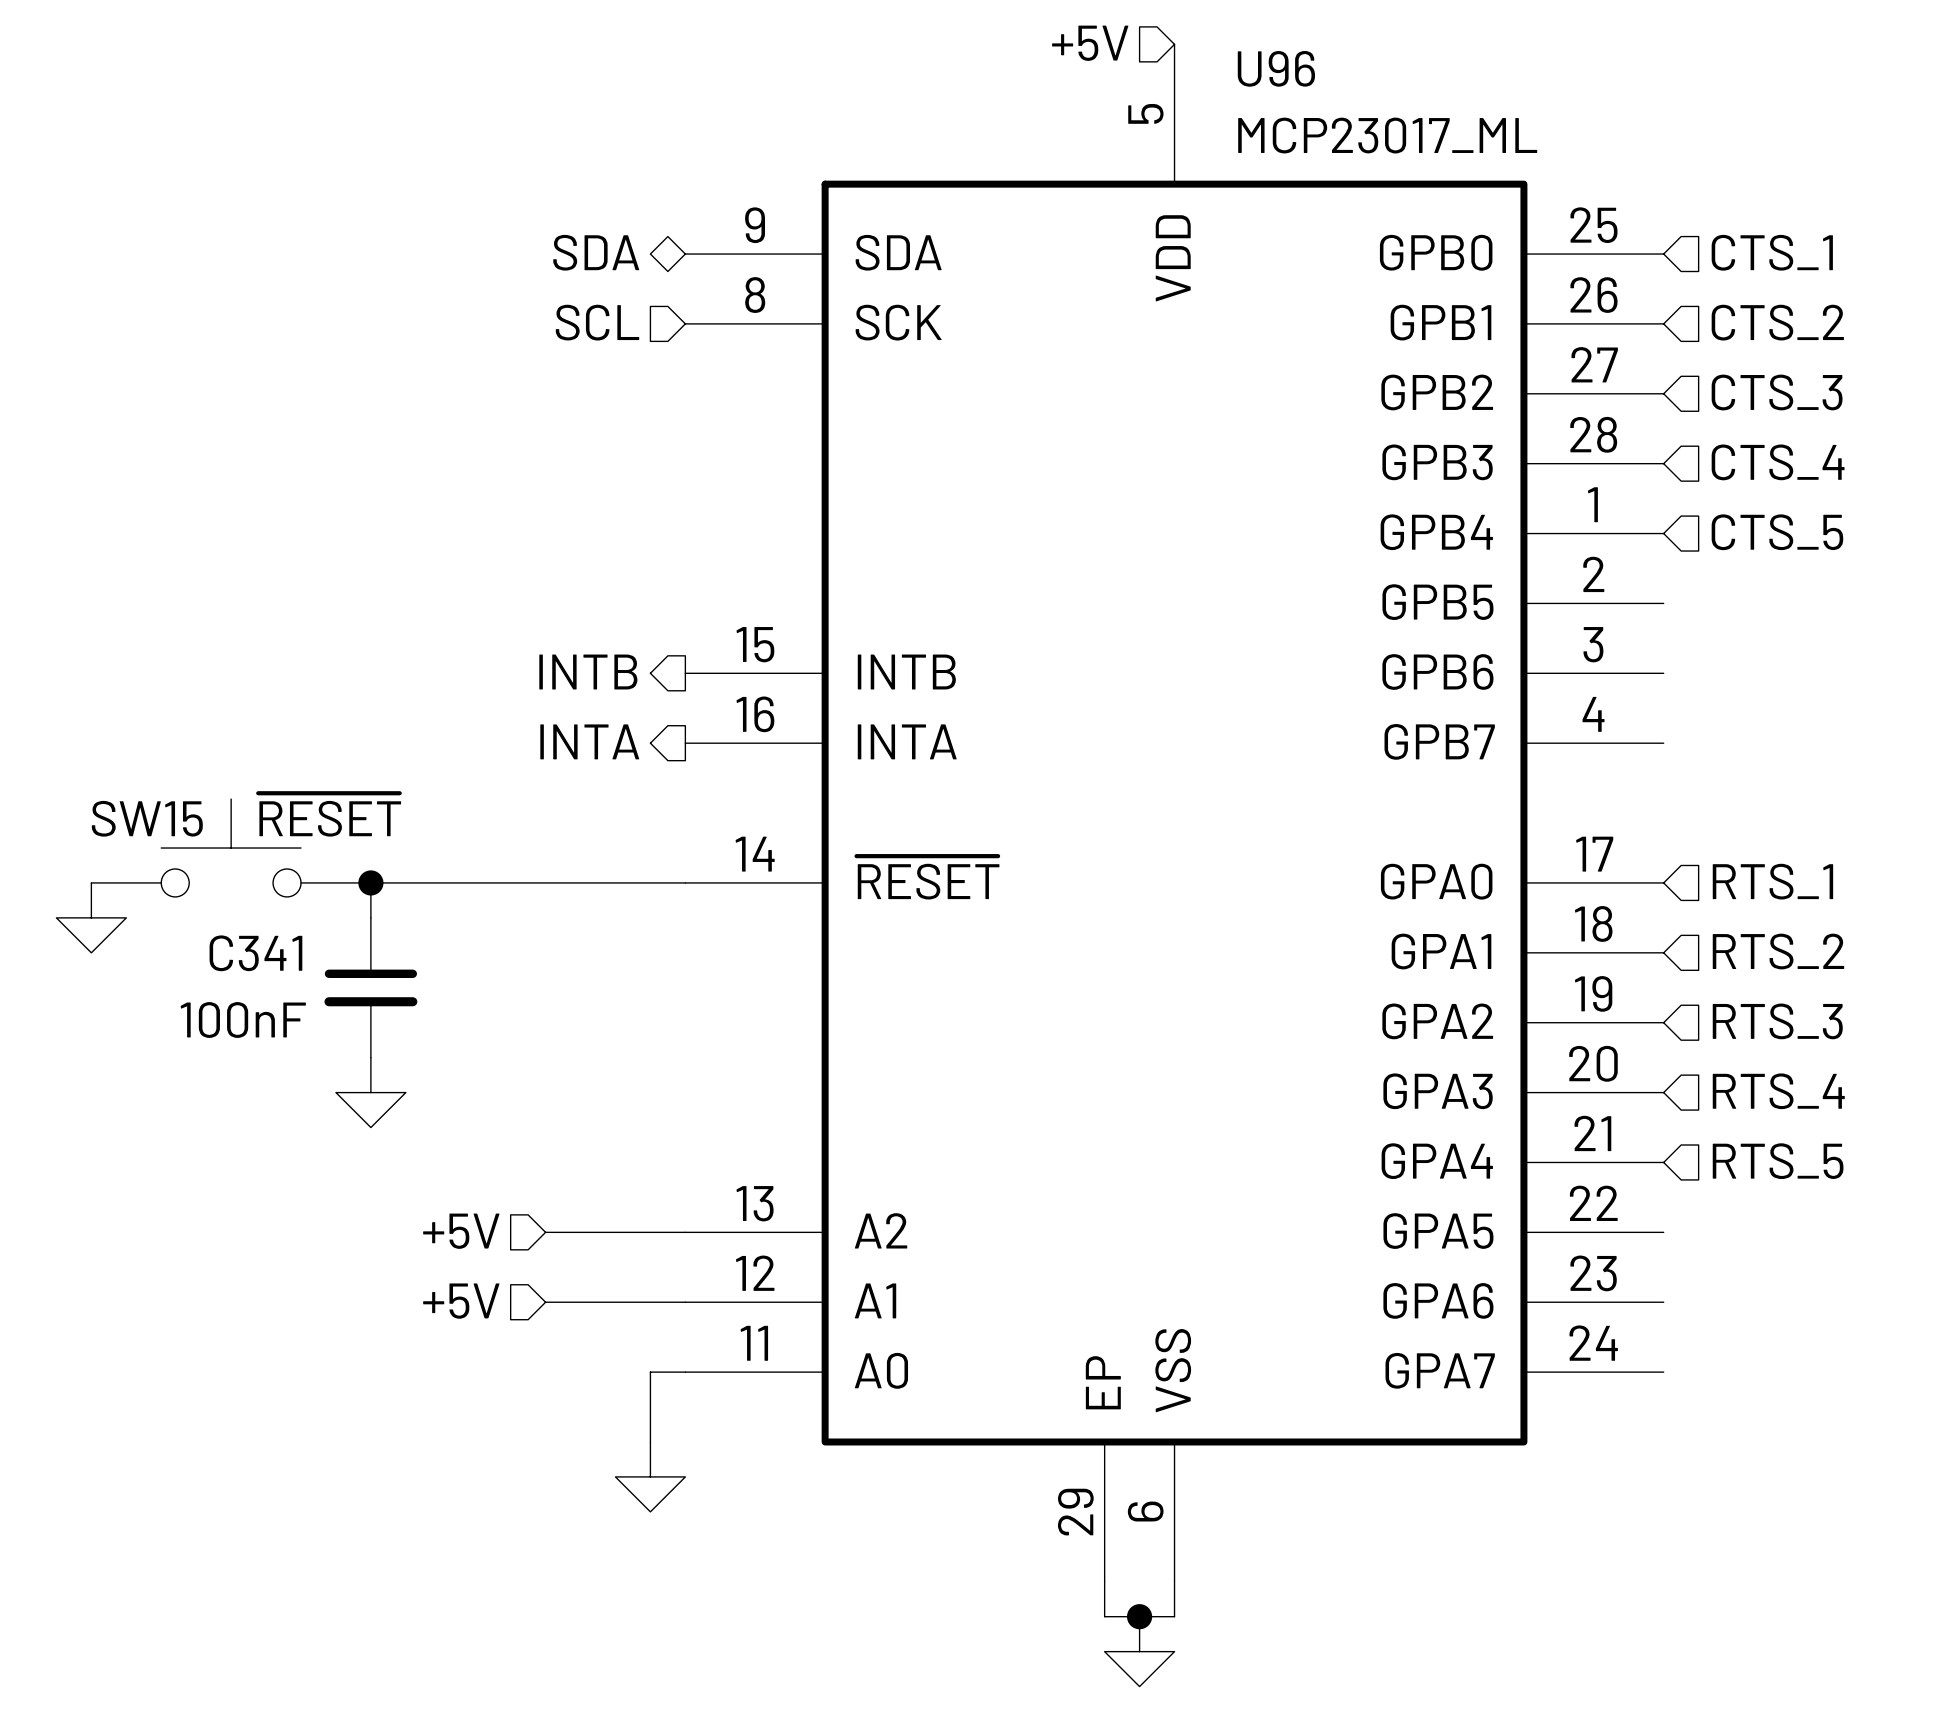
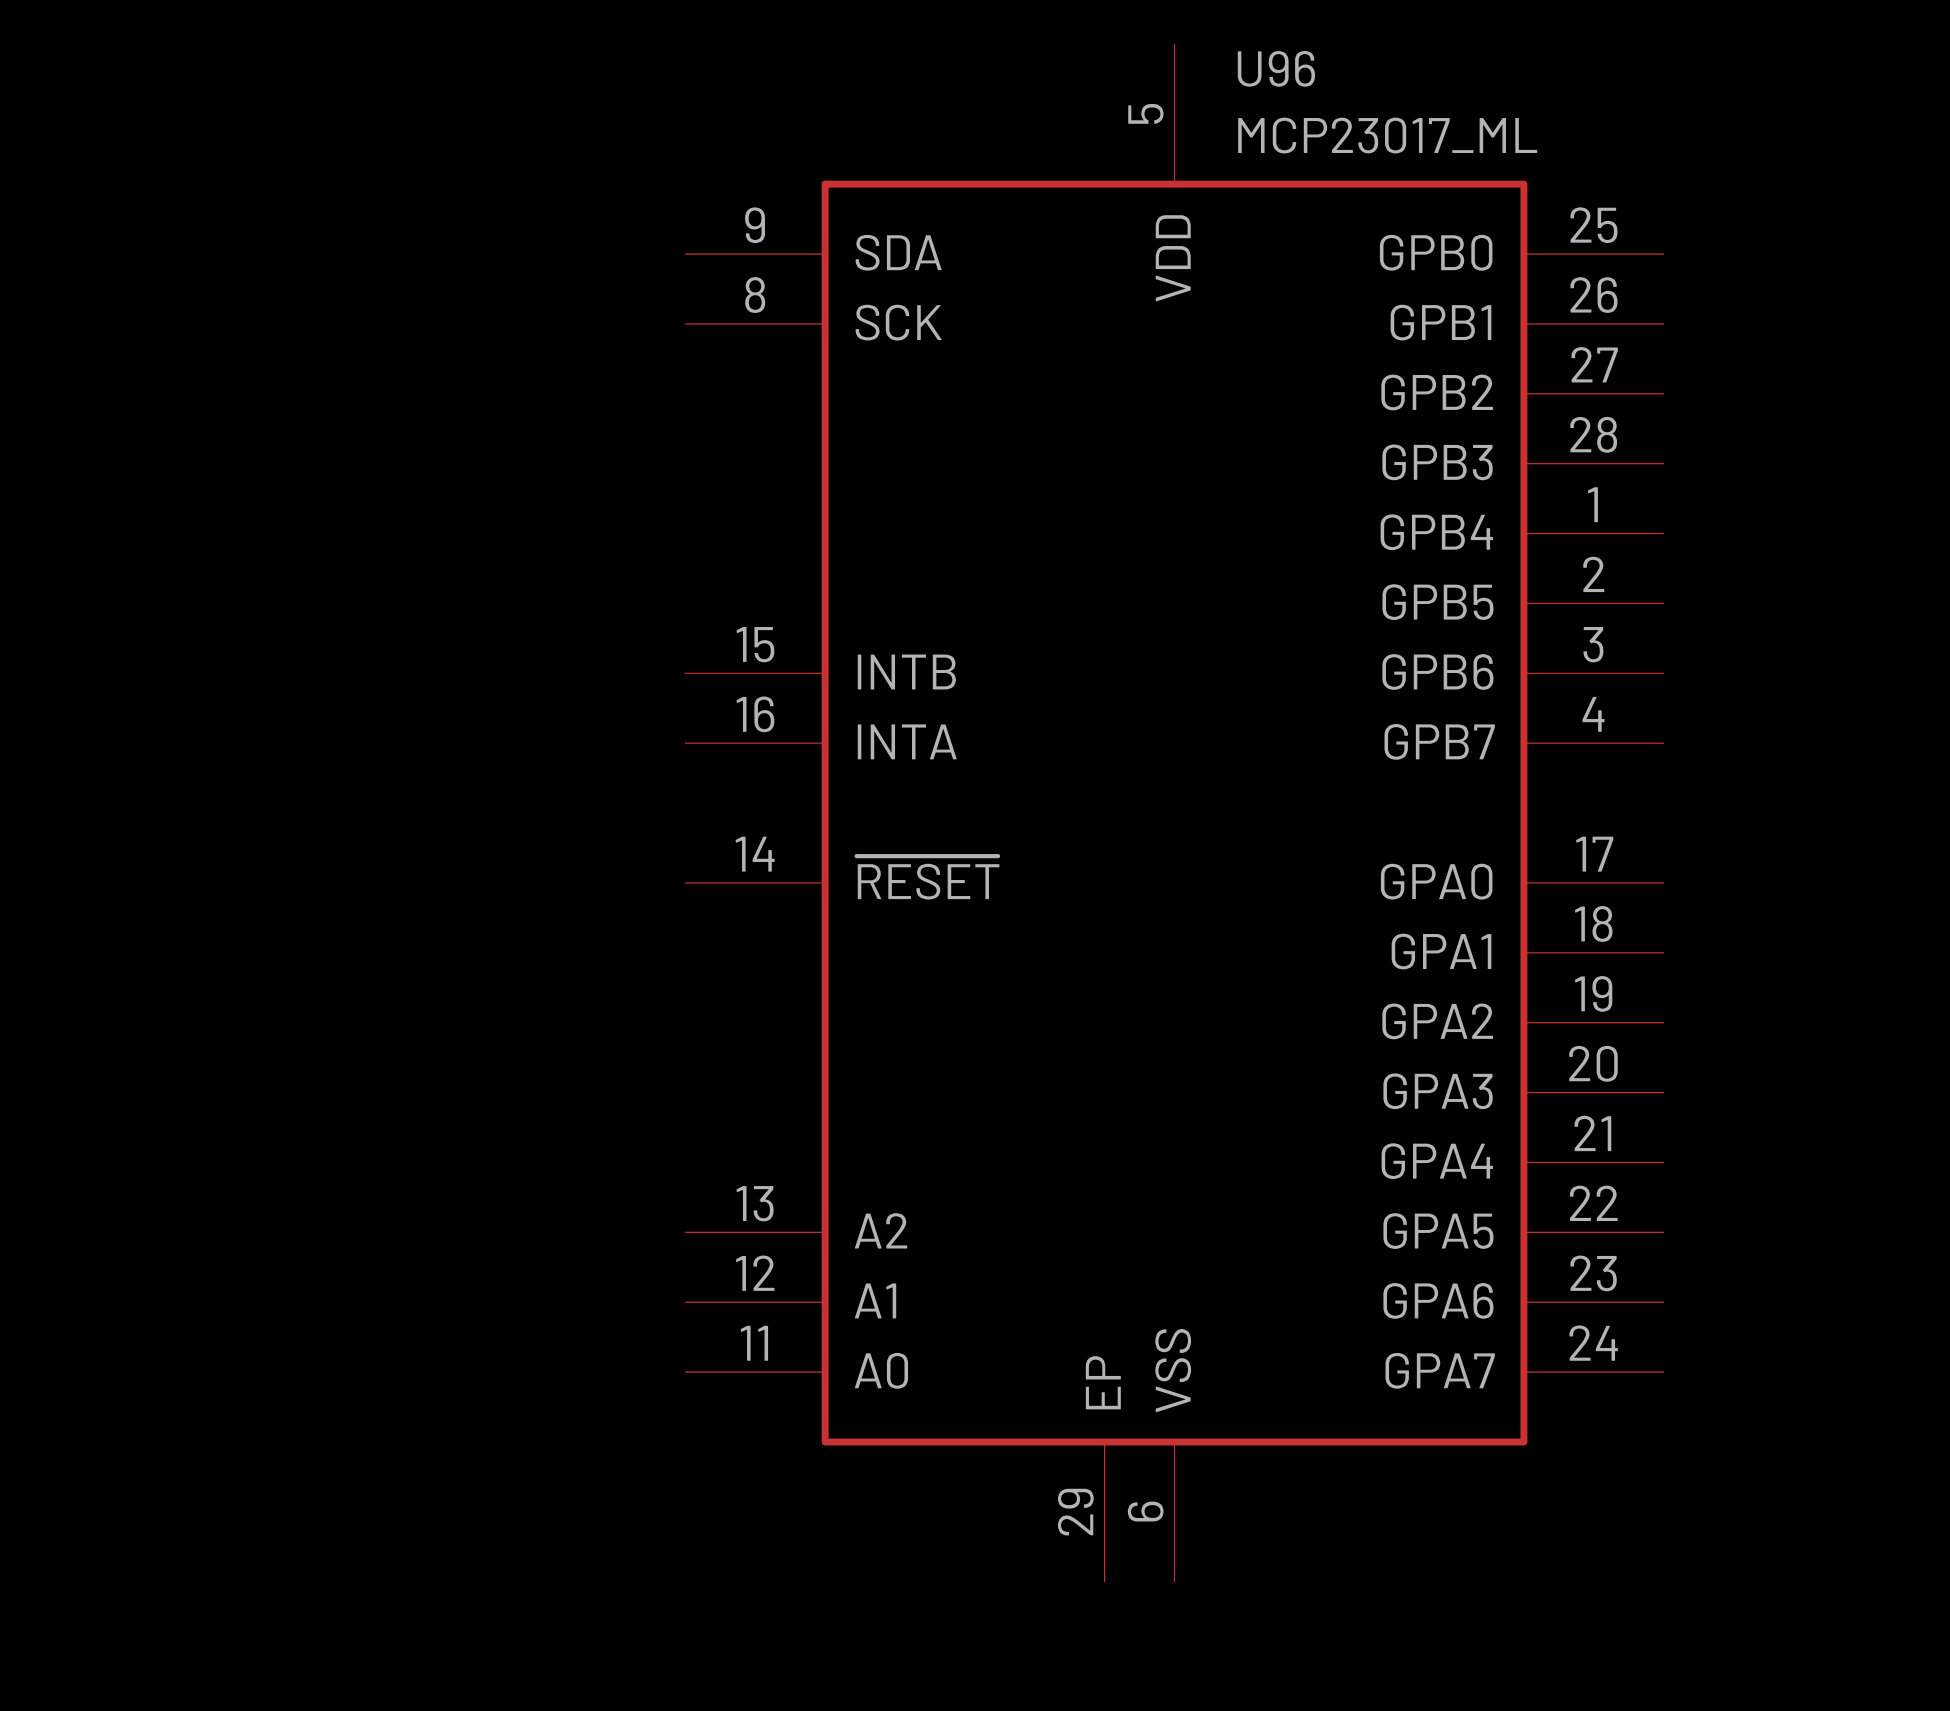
hierarchical label: +5V (1090, 43) -> none
hierarchical label: SDA (596, 252) -> none
hierarchical label: CTS_1 (1772, 252) -> none
hierarchical label: SCL (597, 322) -> none
hierarchical label: CTS_2 (1777, 322) -> none
hierarchical label: CTS_3 (1777, 392) -> none
hierarchical label: CTS_4 (1778, 462) -> none
hierarchical label: CTS_5 (1777, 532) -> none
hierarchical label: INTB (588, 672) -> none
hierarchical label: INTA (589, 741) -> none
SW15: ~{RESET} (231, 848) -> none
hierarchical label: RTS_1 (1772, 881) -> none
junction: (370, 882) -> none
wire: (685, 882) (370, 882) (370, 917) -> none
power symbol: (91, 917) -> none
hierarchical label: RTS_2 (1778, 951) -> none
C341: 100nF (370, 987) -> none
hierarchical label: RTS_3 (1777, 1021) -> none
hierarchical label: RTS_4 (1778, 1091) -> none
power symbol: (370, 1092) -> none
hierarchical label: RTS_5 (1778, 1161) -> none
hierarchical label: +5V (461, 1231) -> none
wire: (545, 1232) (685, 1232) -> none
hierarchical label: +5V (461, 1301) -> none
wire: (545, 1302) (685, 1302) -> none
wire: (685, 1372) (650, 1372) (650, 1441) -> none
power symbol: (650, 1476) -> none
wire: (1104, 1581) (1104, 1616) (1174, 1616) (1174, 1581) -> none
junction: (1139, 1616) -> none
power symbol: (1139, 1651) -> none

